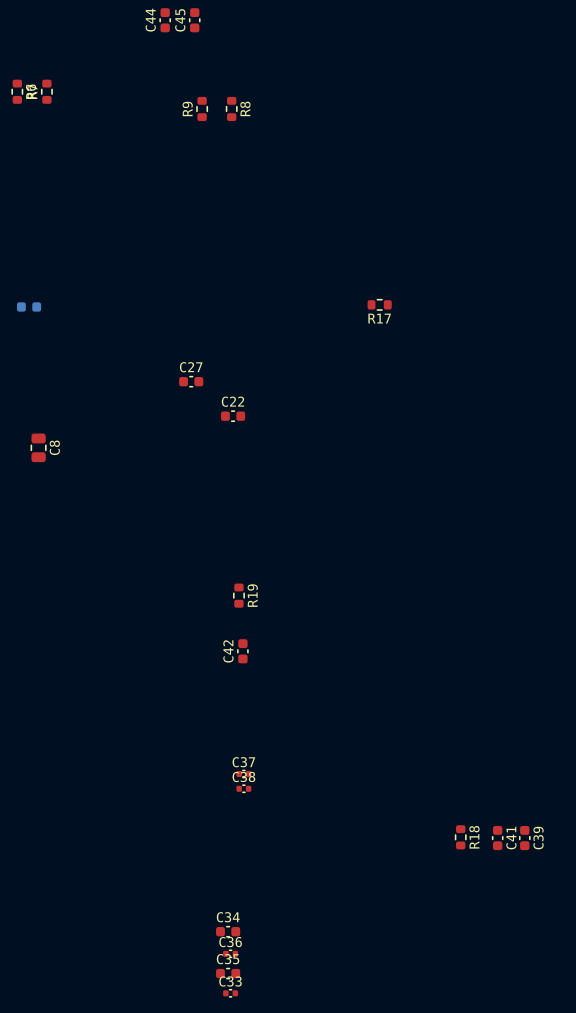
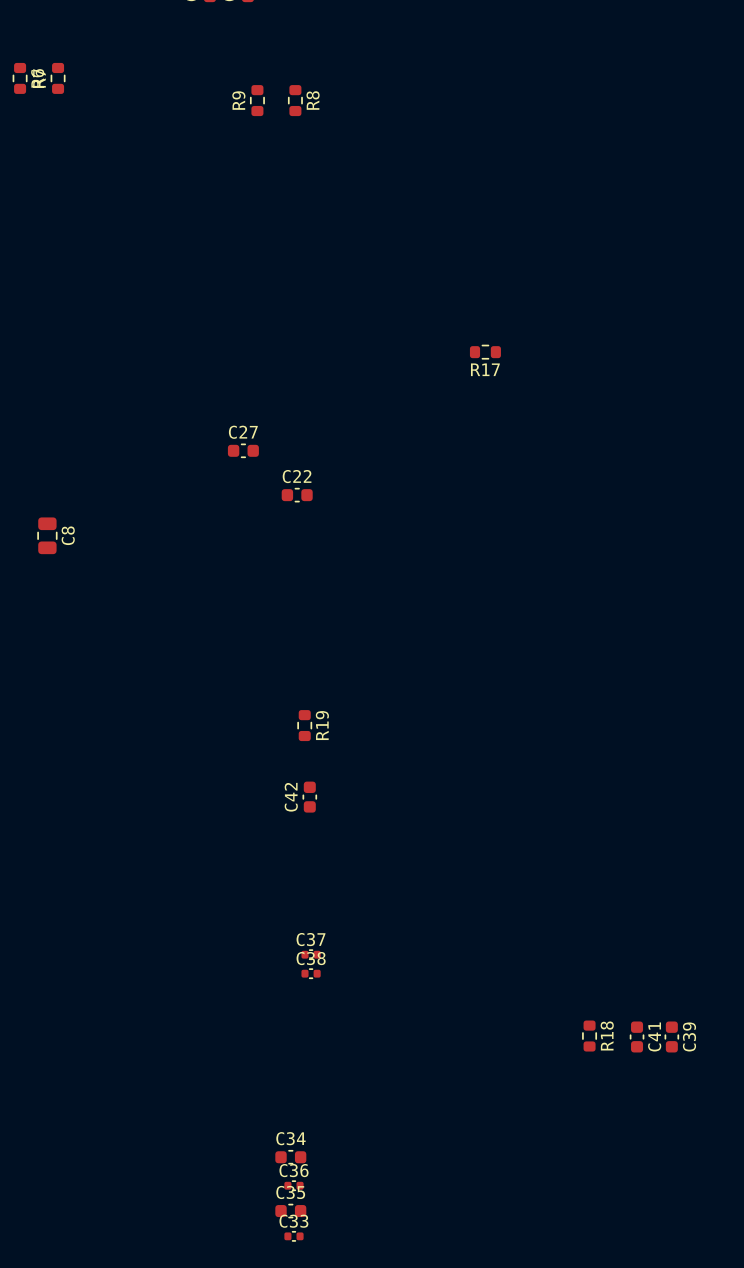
part: (29, 306) -> none

